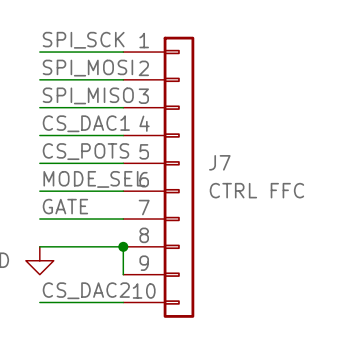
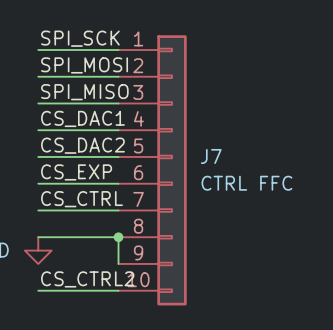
label: CS_POTS (85, 151) -> CS_DAC2 (82, 145)
label: MODE_SEL (94, 179) -> CS_EXP (76, 172)
label: GATE (65, 206) -> CS_CTRL (81, 199)
label: CS_DAC2 (86, 290) -> CS_CTRL2 (87, 279)

